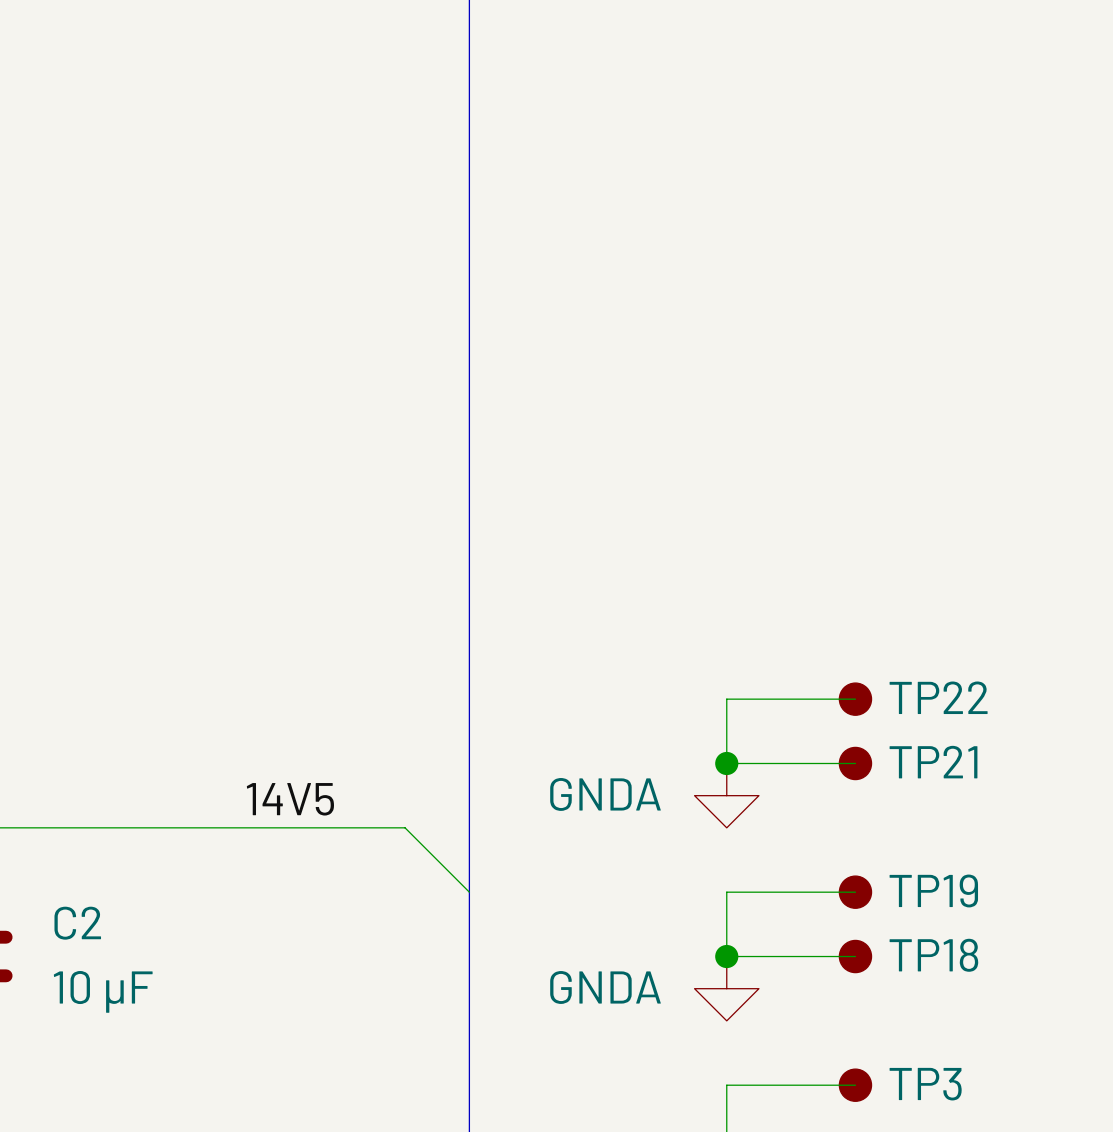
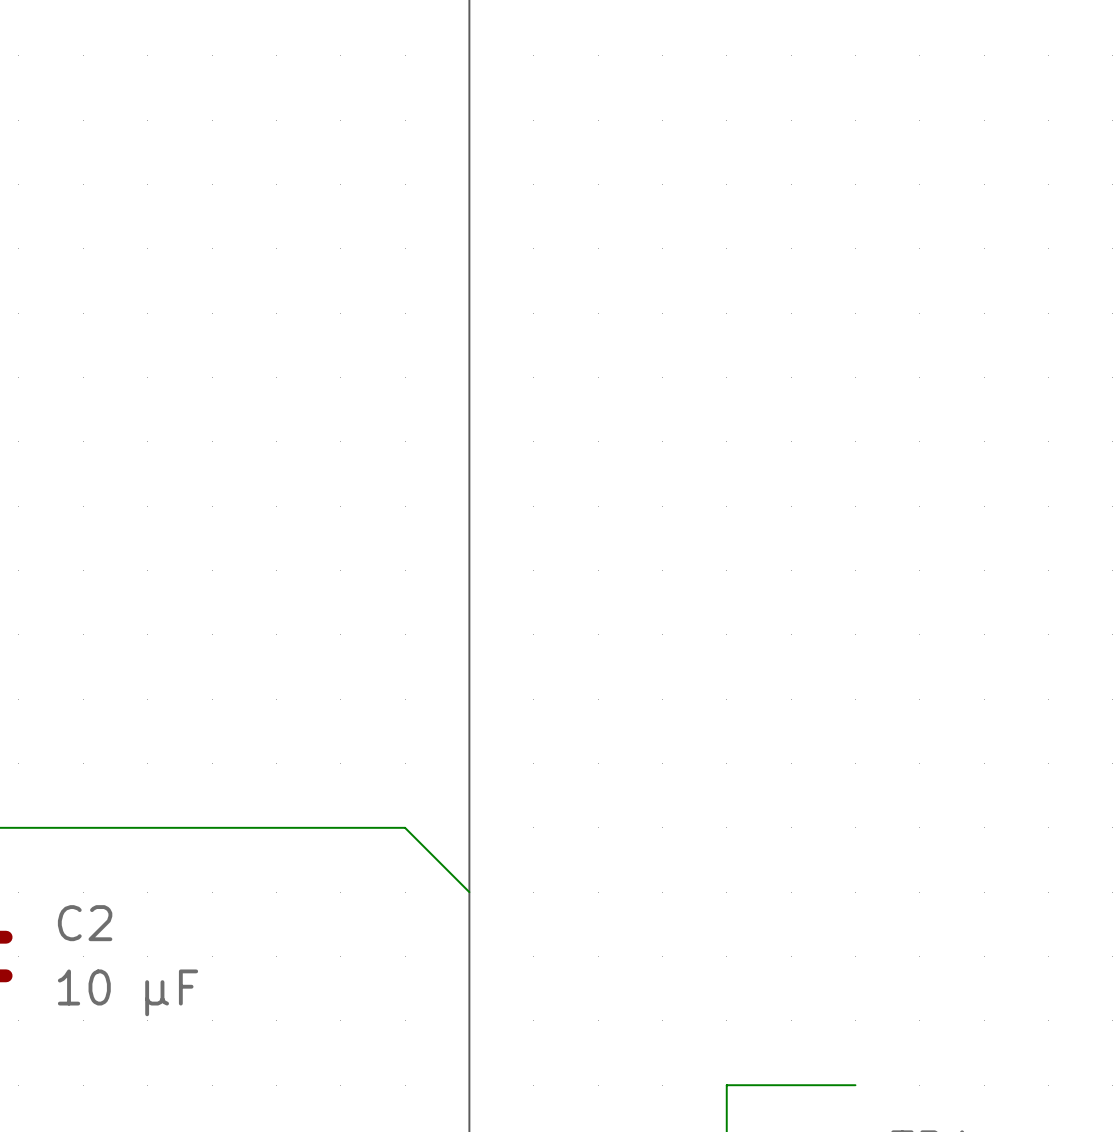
wire: (855, 699) (726, 699) (726, 763) (855, 763) -> none
TP22: (855, 699) -> none
junction: (726, 763) -> none
TP21: (855, 763) -> none
power symbol: GNDA (726, 795) -> none
label: 14V5 (290, 799) -> none
wire: (855, 892) (726, 892) (726, 956) (855, 956) -> none
TP19: (855, 892) -> none
junction: (726, 956) -> none
TP18: (855, 956) -> none
power symbol: GNDA (726, 988) -> none
TP3: (855, 1085) -> none

